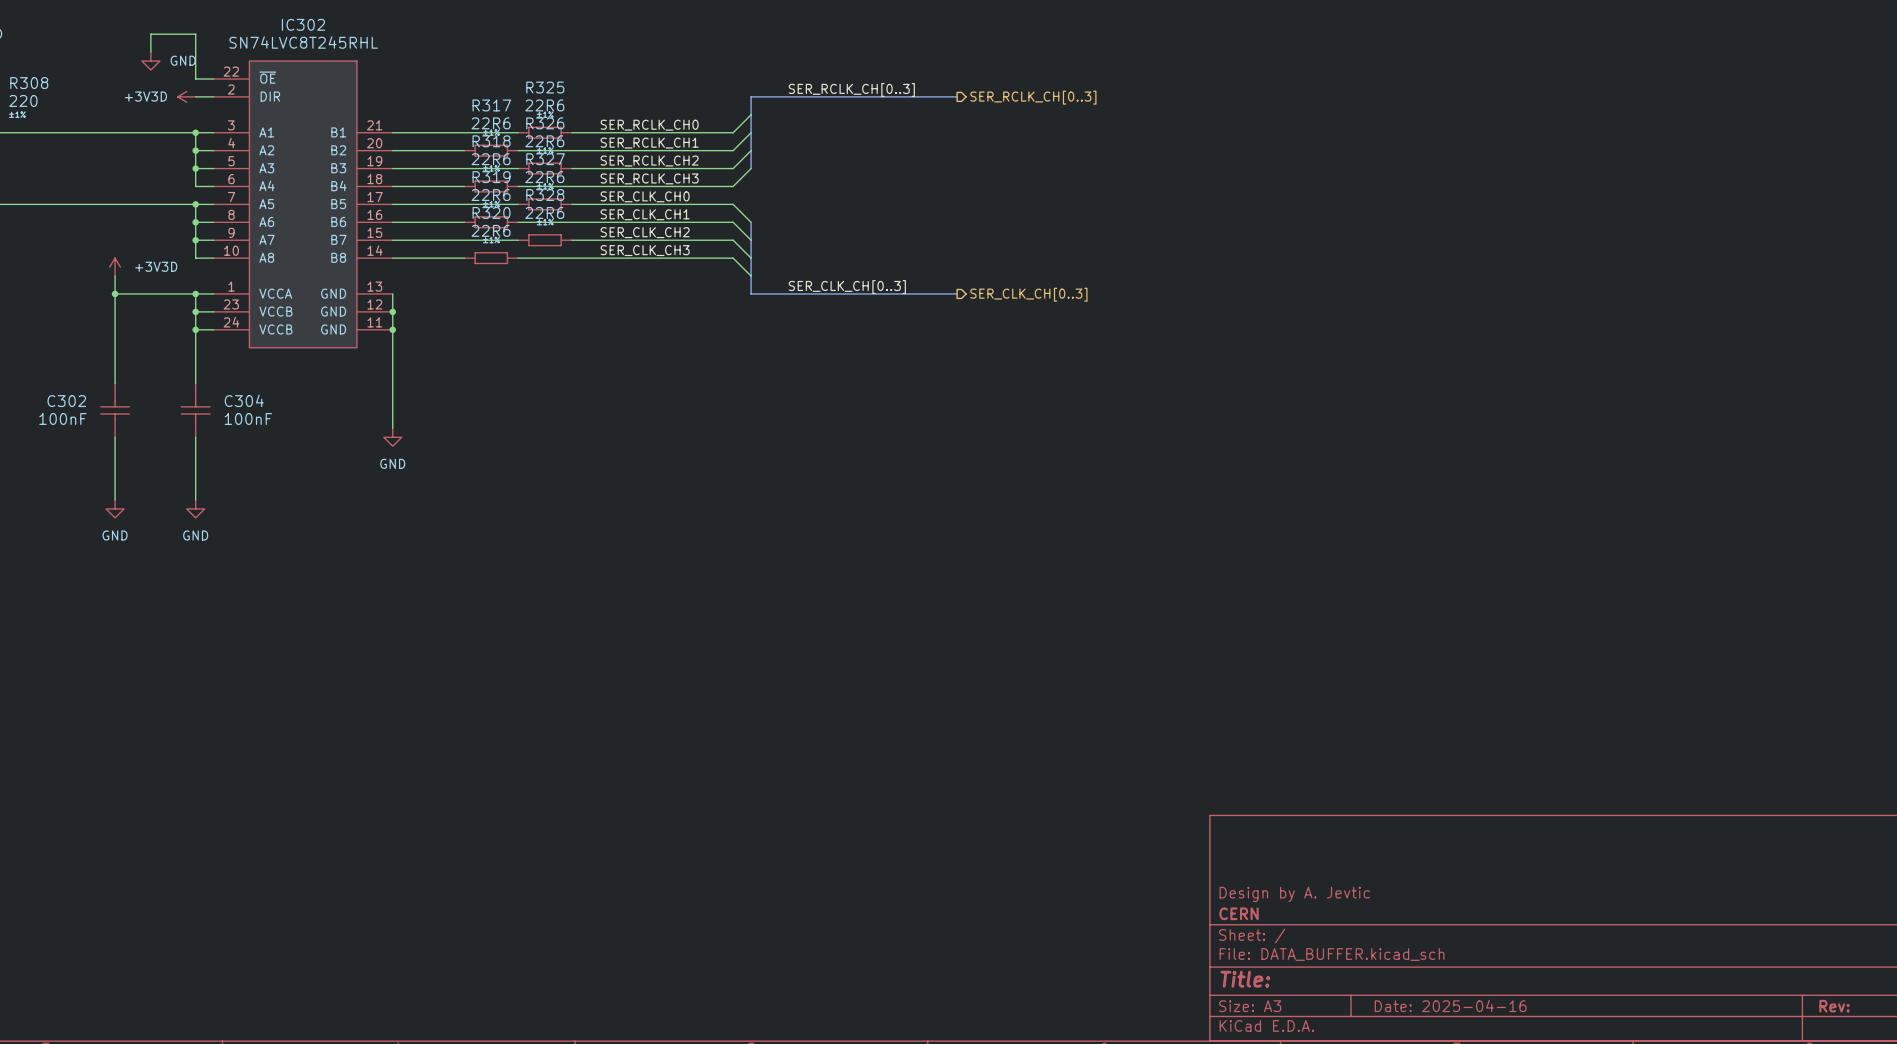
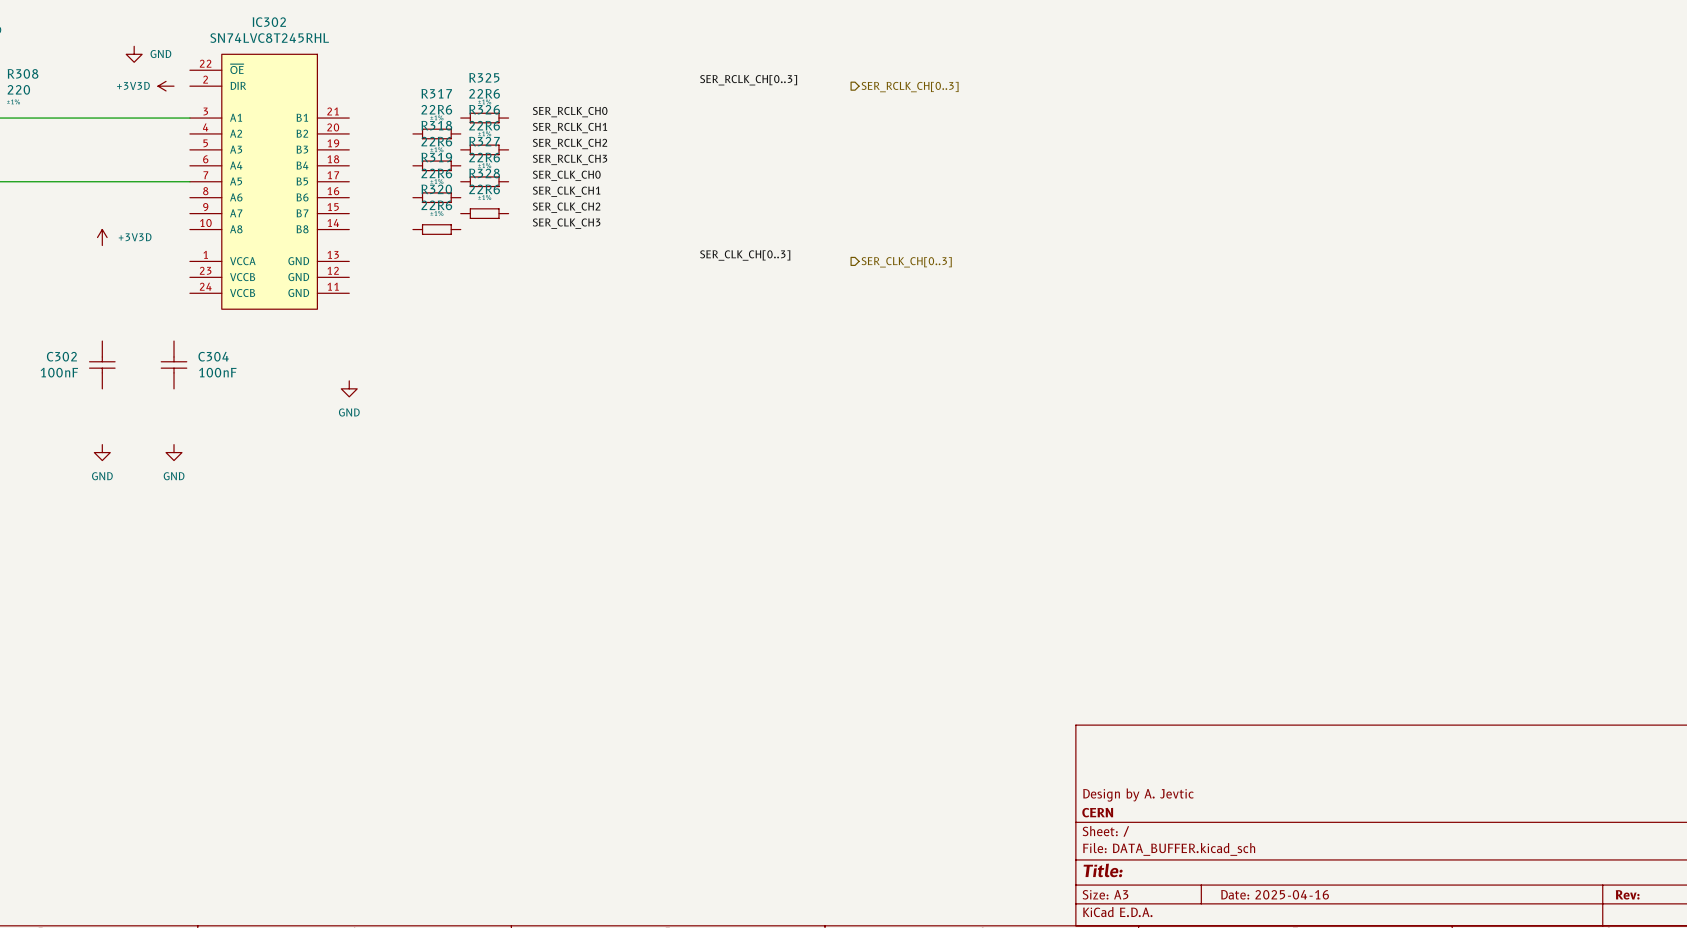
wire: (150, 52) (150, 34) (195, 34) (195, 78) (213, 78) -> none
wire: (195, 96) (213, 96) -> none
bus: (957, 96) (751, 96) (751, 168) -> none
wire: (751, 114) (733, 132) (571, 132) -> none
wire: (195, 132) (195, 186) (213, 186) -> none
junction: (195, 132) -> none
wire: (392, 132) (518, 132) -> none
wire: (751, 132) (733, 150) (518, 150) -> none
wire: (195, 150) (213, 150) -> none
junction: (195, 150) -> none
wire: (392, 150) (464, 150) -> none
wire: (751, 150) (733, 168) (571, 168) -> none
wire: (195, 168) (213, 168) -> none
junction: (195, 168) -> none
wire: (392, 168) (518, 168) -> none
wire: (751, 168) (733, 186) (518, 186) -> none
wire: (392, 186) (464, 186) -> none
wire: (195, 204) (195, 258) (213, 258) -> none
junction: (195, 204) -> none
wire: (392, 204) (518, 204) -> none
wire: (571, 204) (733, 204) (751, 222) -> none
wire: (195, 222) (213, 222) -> none
junction: (195, 222) -> none
wire: (392, 222) (464, 222) -> none
wire: (518, 222) (733, 222) (751, 240) -> none
bus: (751, 222) (751, 293) (957, 293) -> none
wire: (195, 240) (213, 240) -> none
junction: (195, 240) -> none
wire: (392, 240) (518, 240) -> none
wire: (571, 240) (733, 240) (751, 258) -> none
wire: (392, 258) (464, 258) -> none
wire: (518, 258) (733, 258) (751, 276) -> none
wire: (115, 276) (115, 383) -> none
wire: (115, 293) (213, 293) -> none
junction: (115, 293) -> none
wire: (195, 293) (195, 383) -> none
junction: (195, 293) -> none
wire: (392, 293) (392, 428) -> none
wire: (195, 311) (213, 311) -> none
junction: (195, 311) -> none
junction: (392, 311) -> none
wire: (195, 329) (213, 329) -> none
junction: (195, 329) -> none
junction: (392, 329) -> none
wire: (115, 437) (115, 500) -> none
wire: (195, 437) (195, 500) -> none

